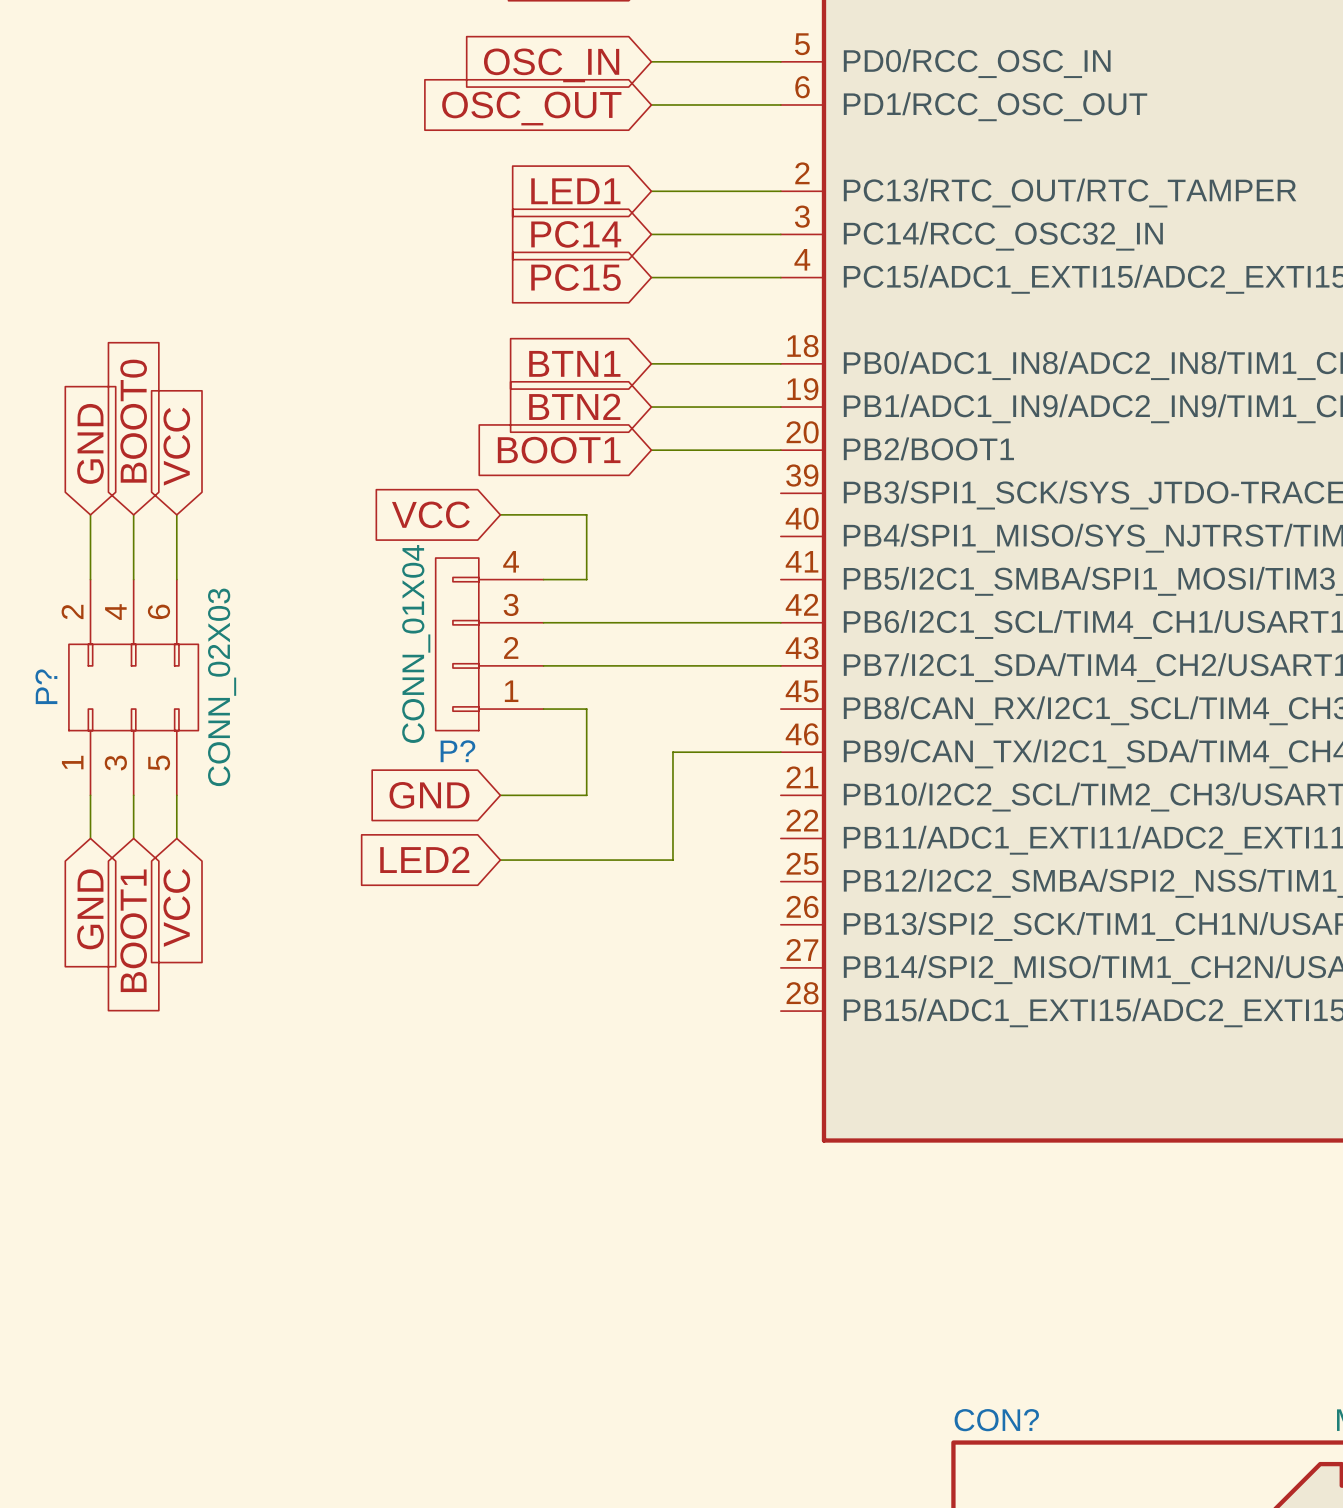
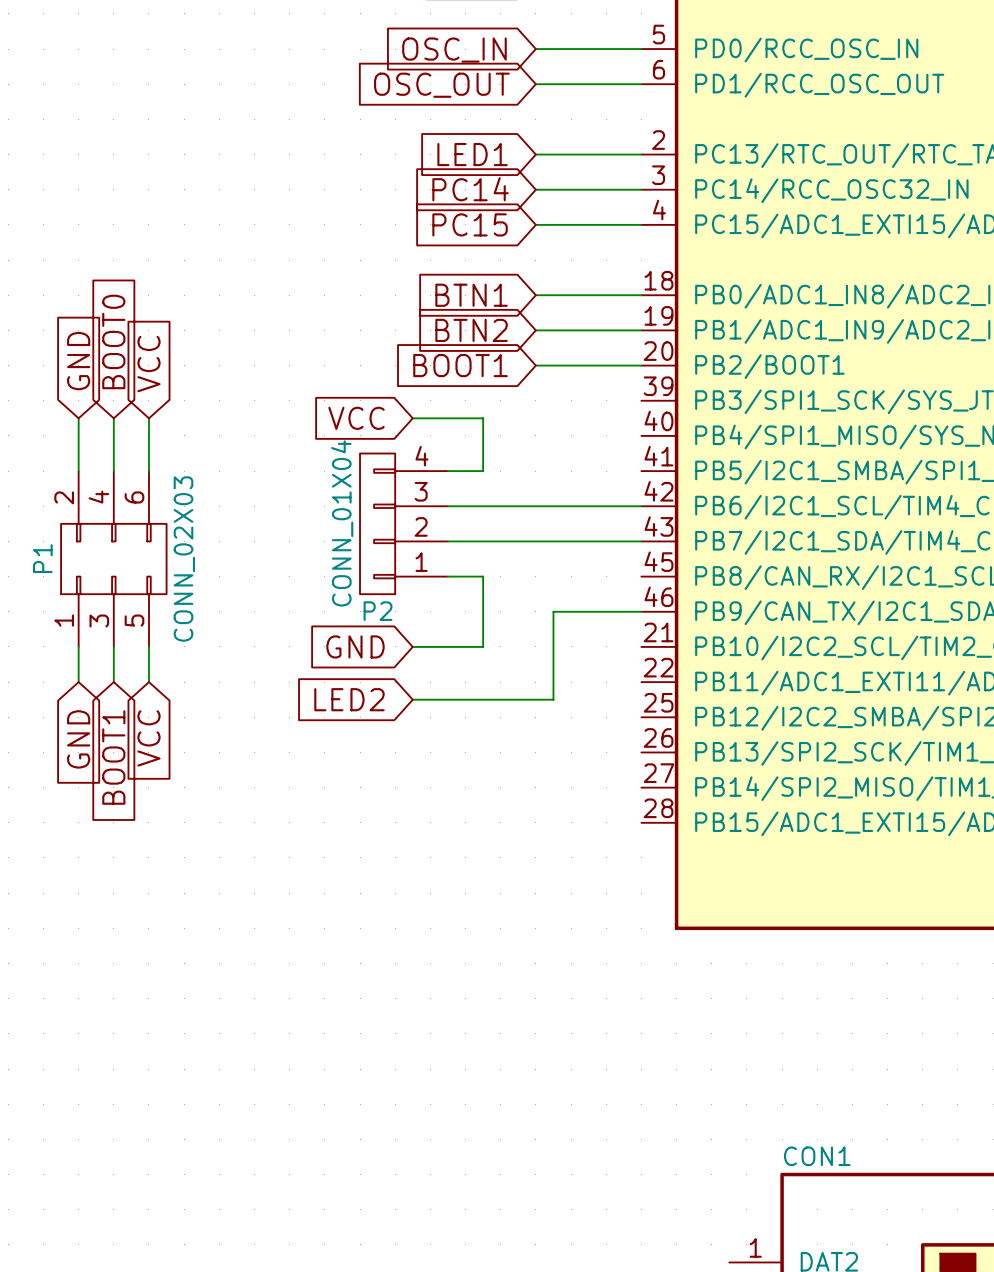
P? name: P? (46, 686) -> P1 (42, 558)
P? name: P? (457, 751) -> P2 (378, 611)
CON? name: CON? (996, 1420) -> CON1 (817, 1156)

